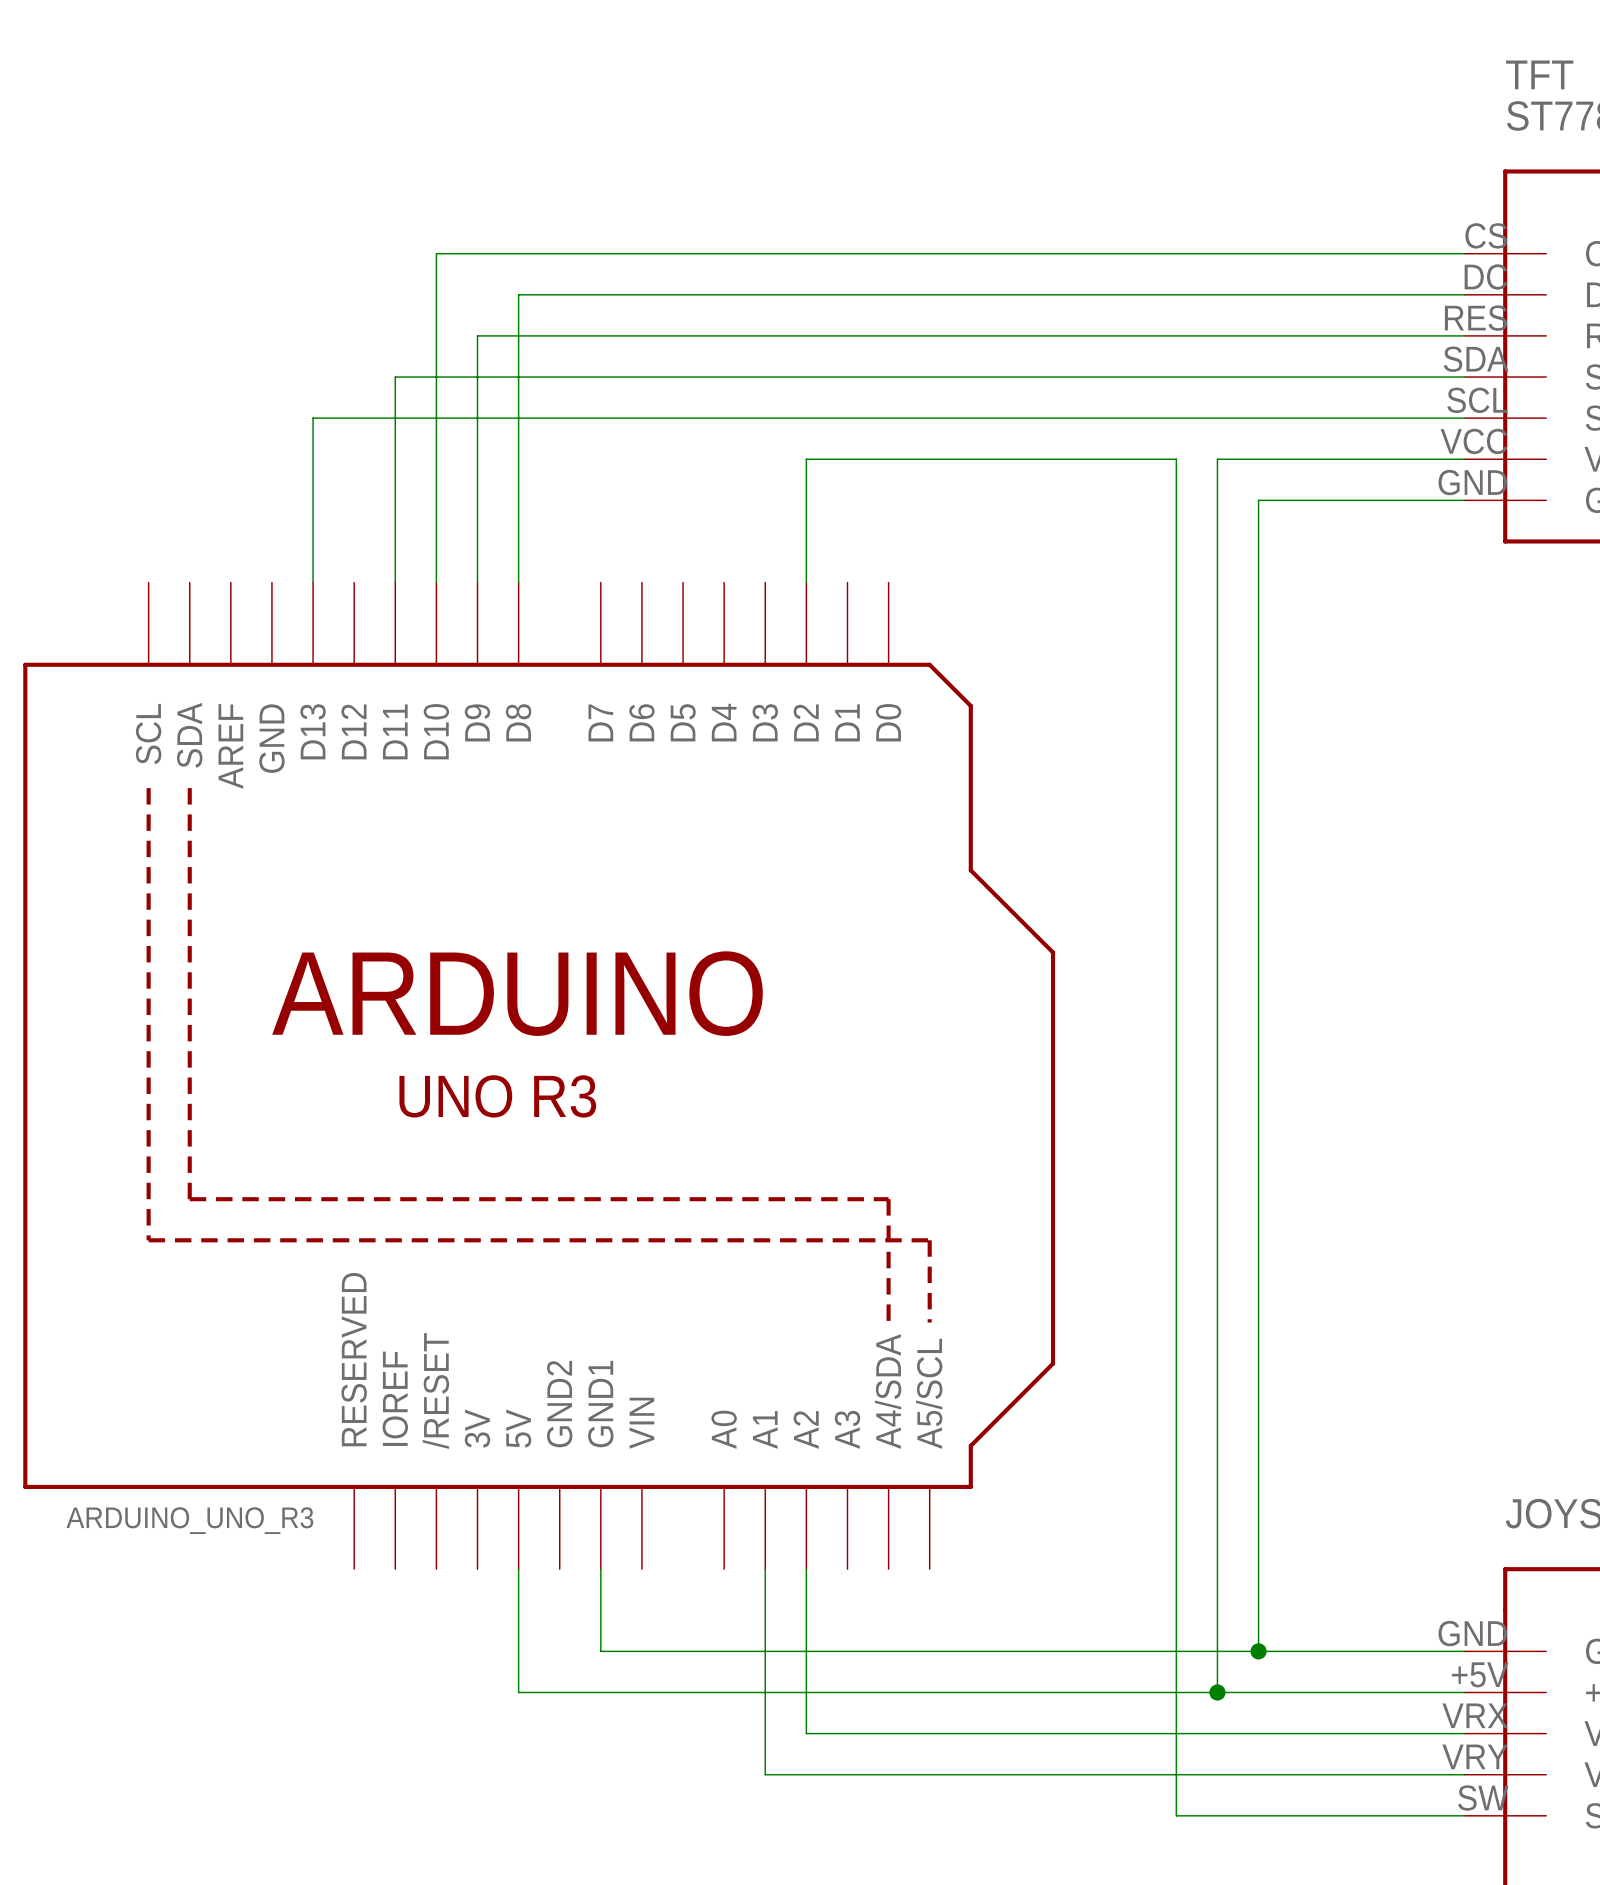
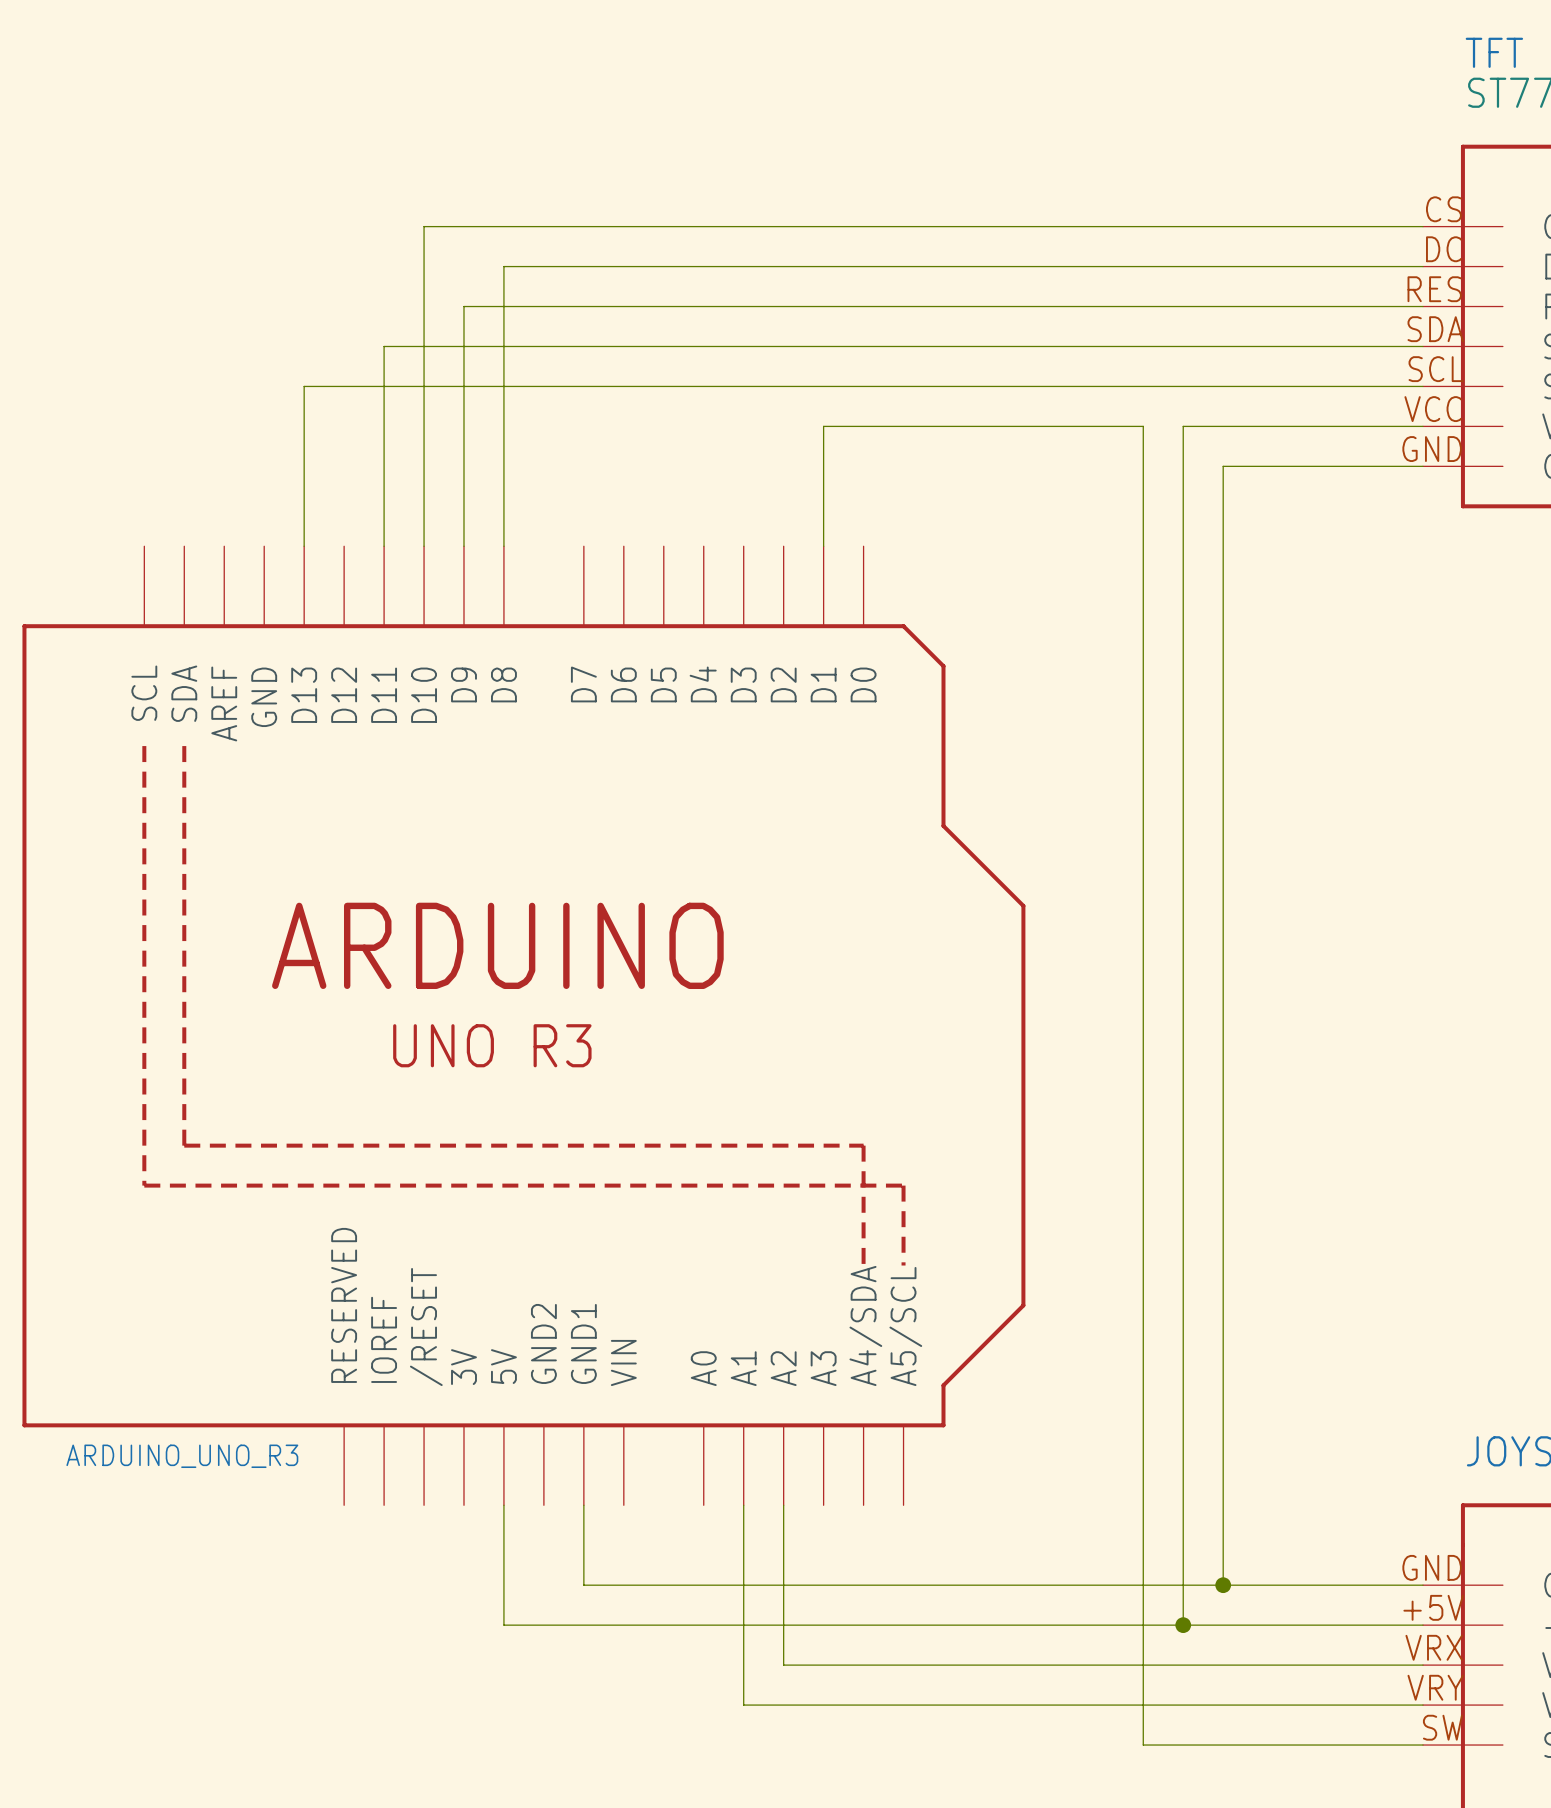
wire: (847, 459) (806, 459) (806, 582) -> (823, 426) (823, 546)

